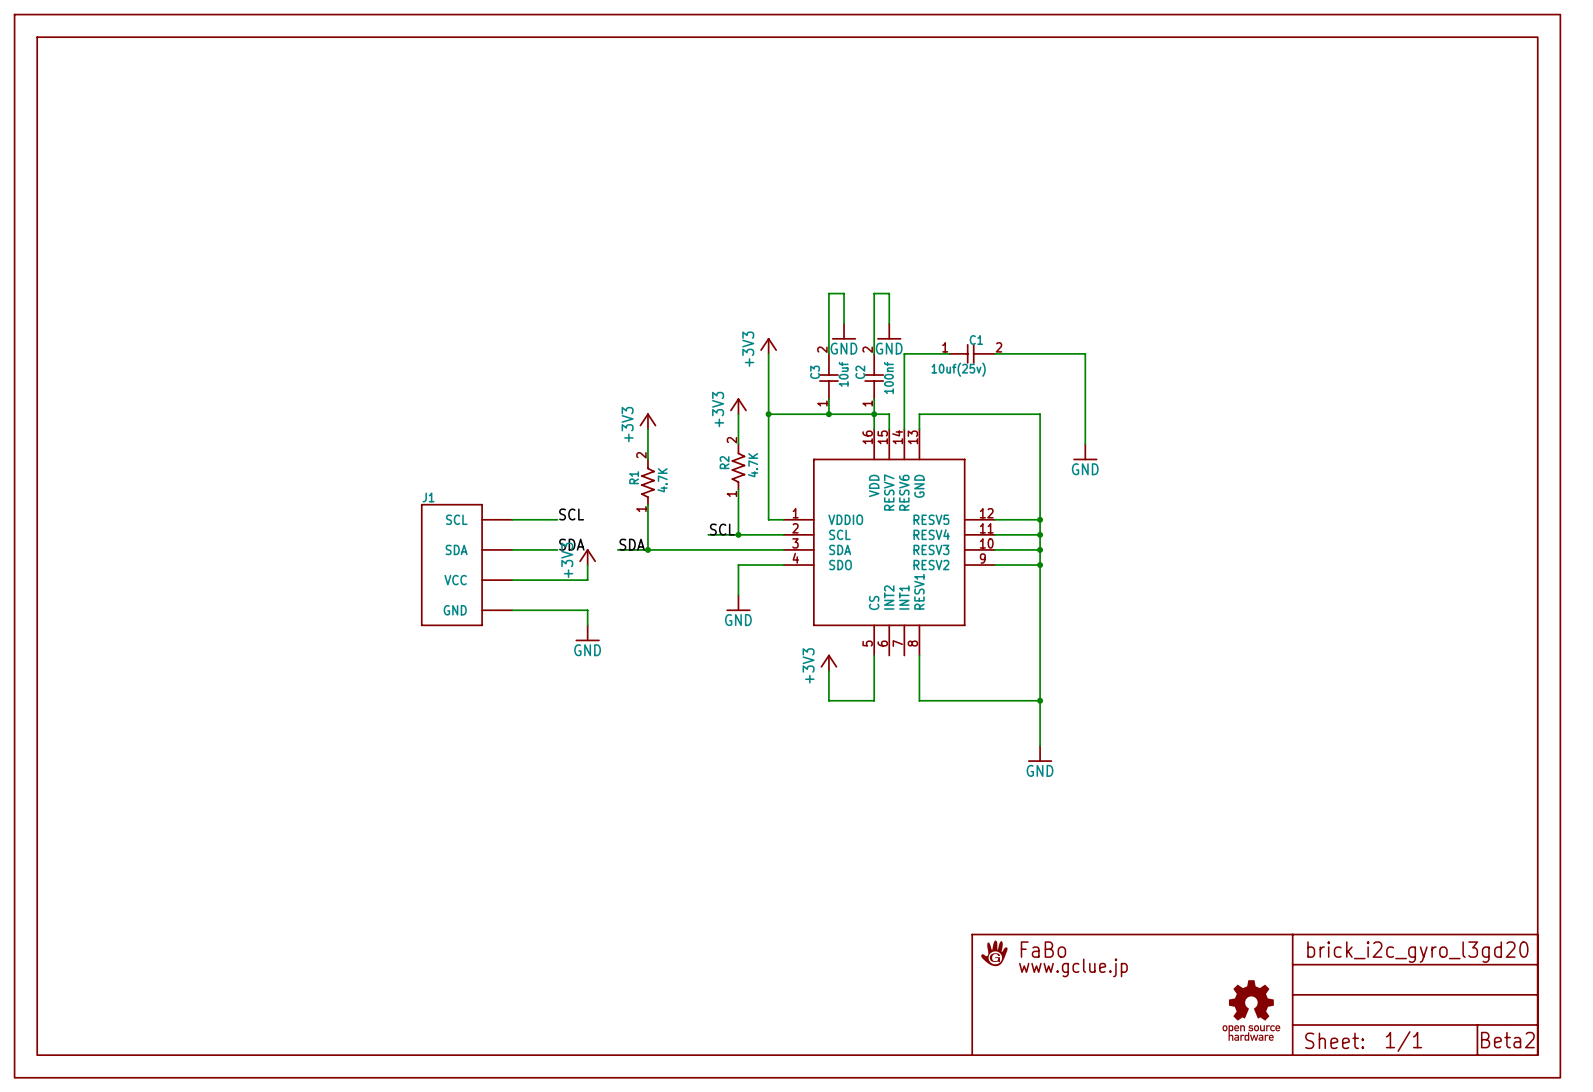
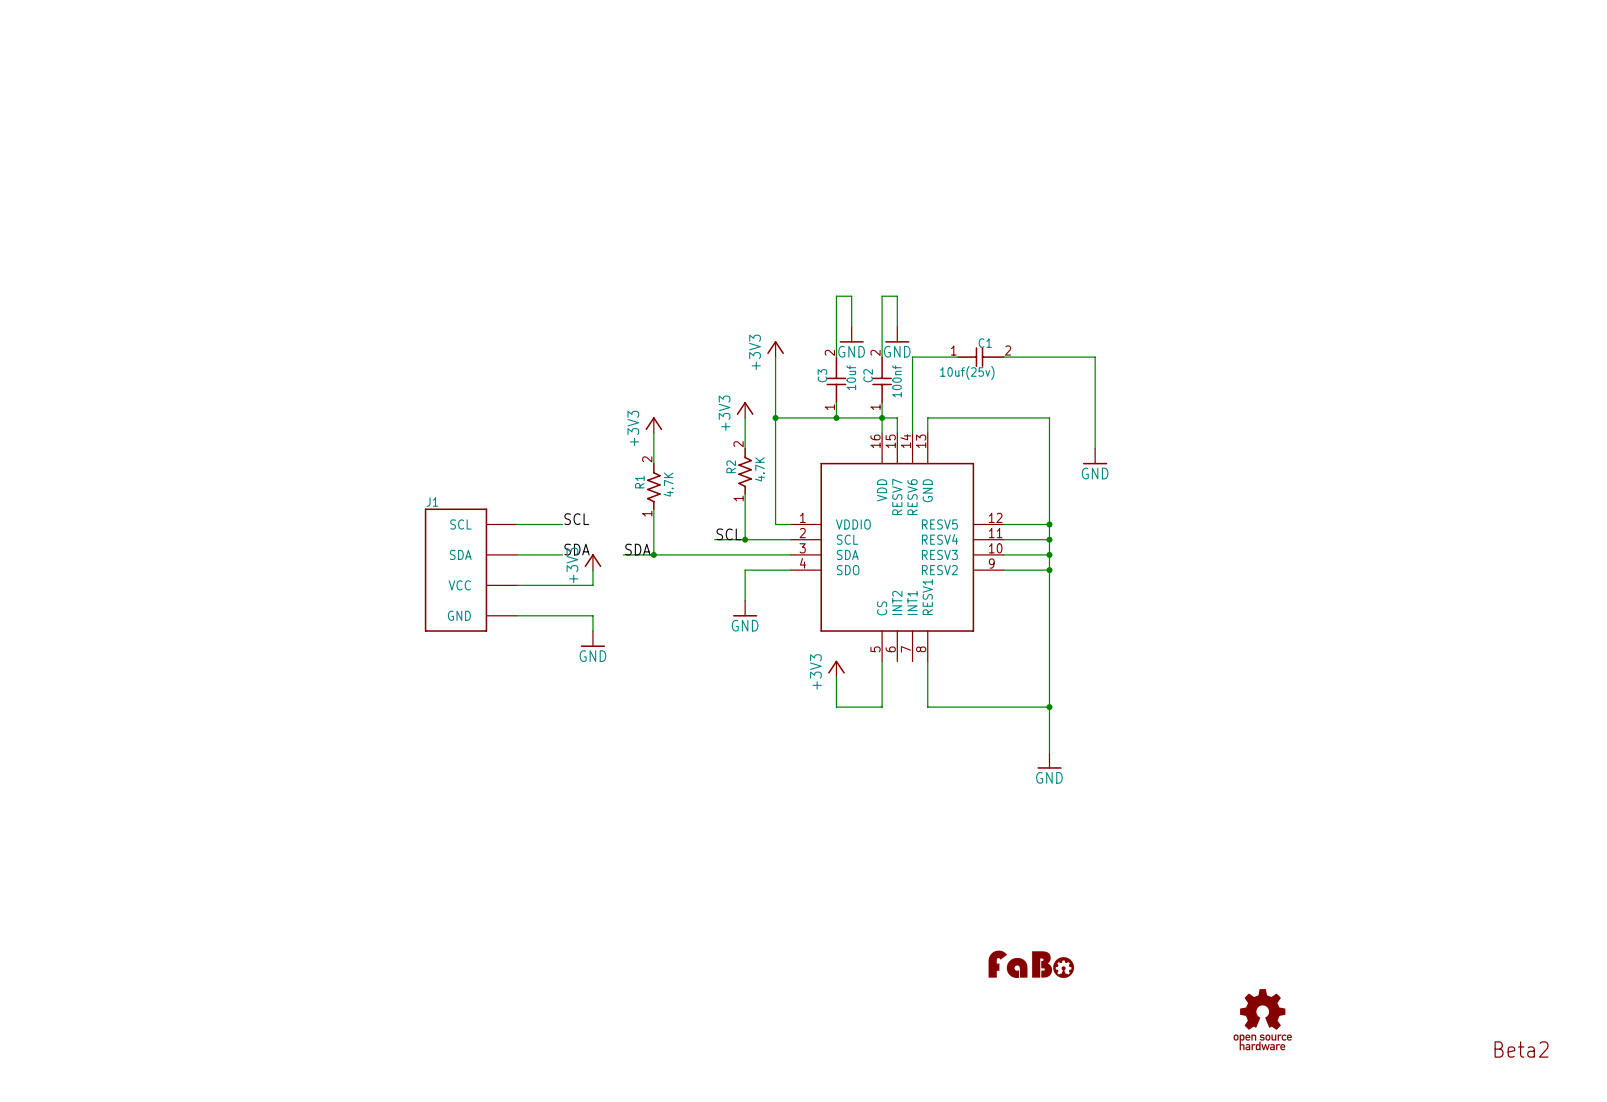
part: (787, 546) -> none
part: none -> (1031, 964)

